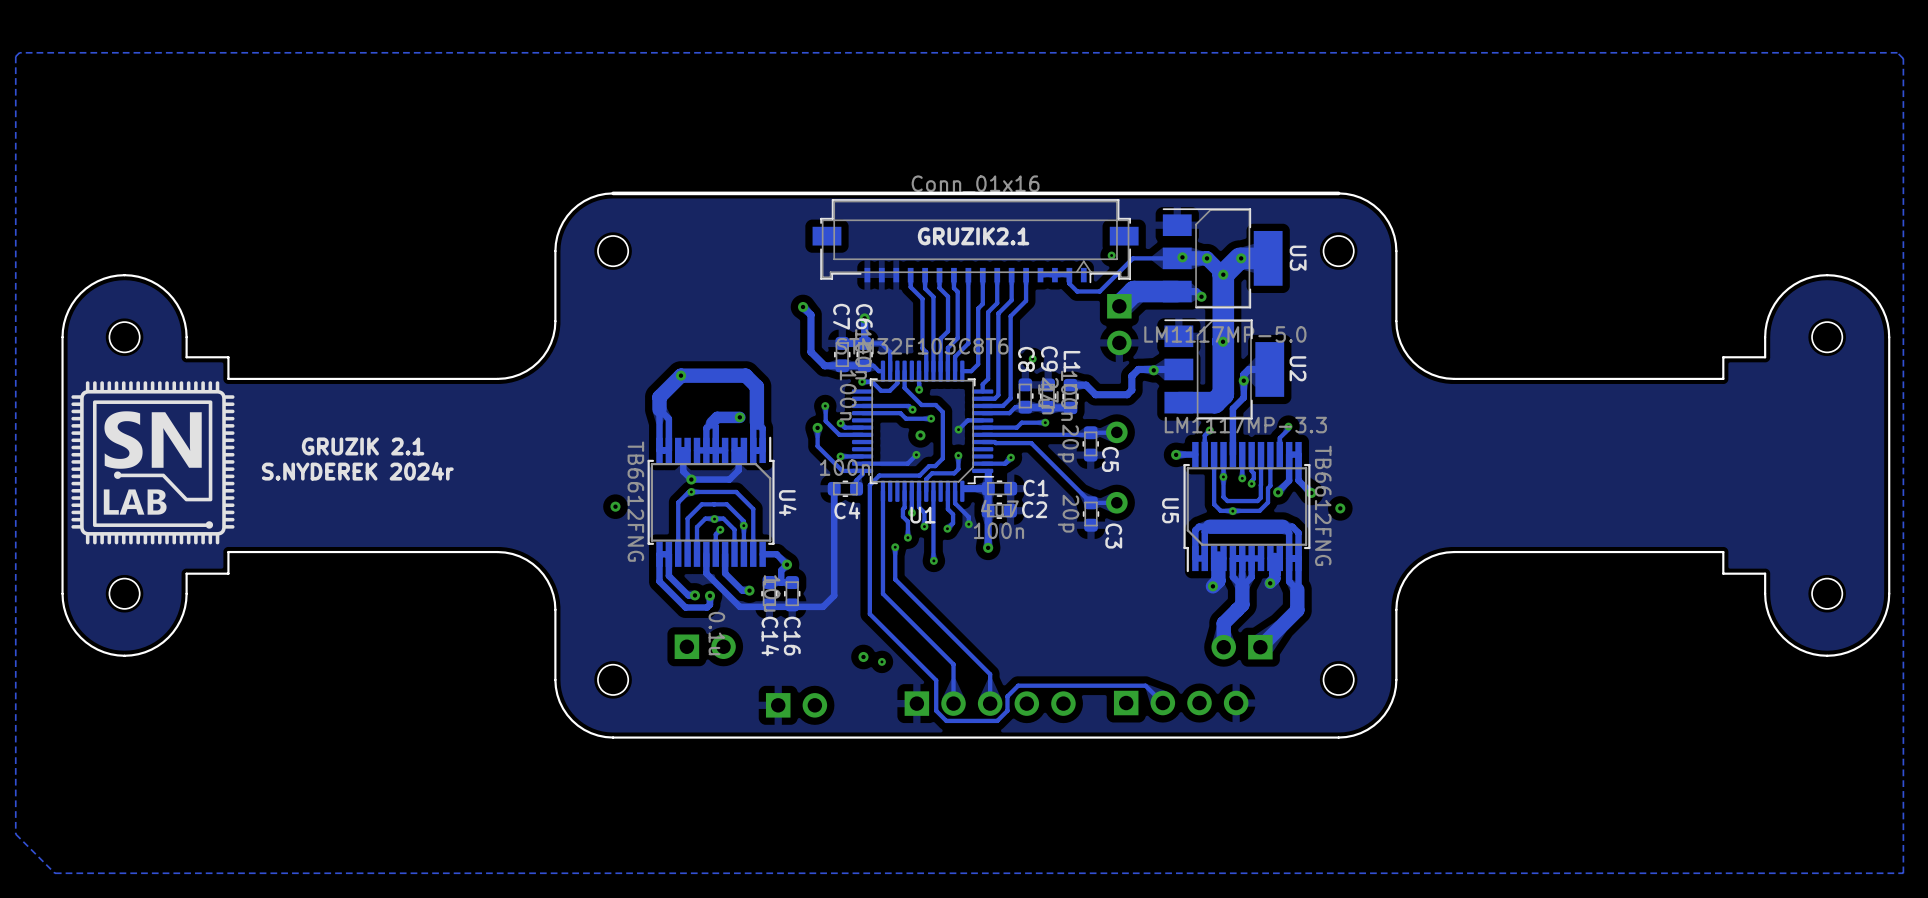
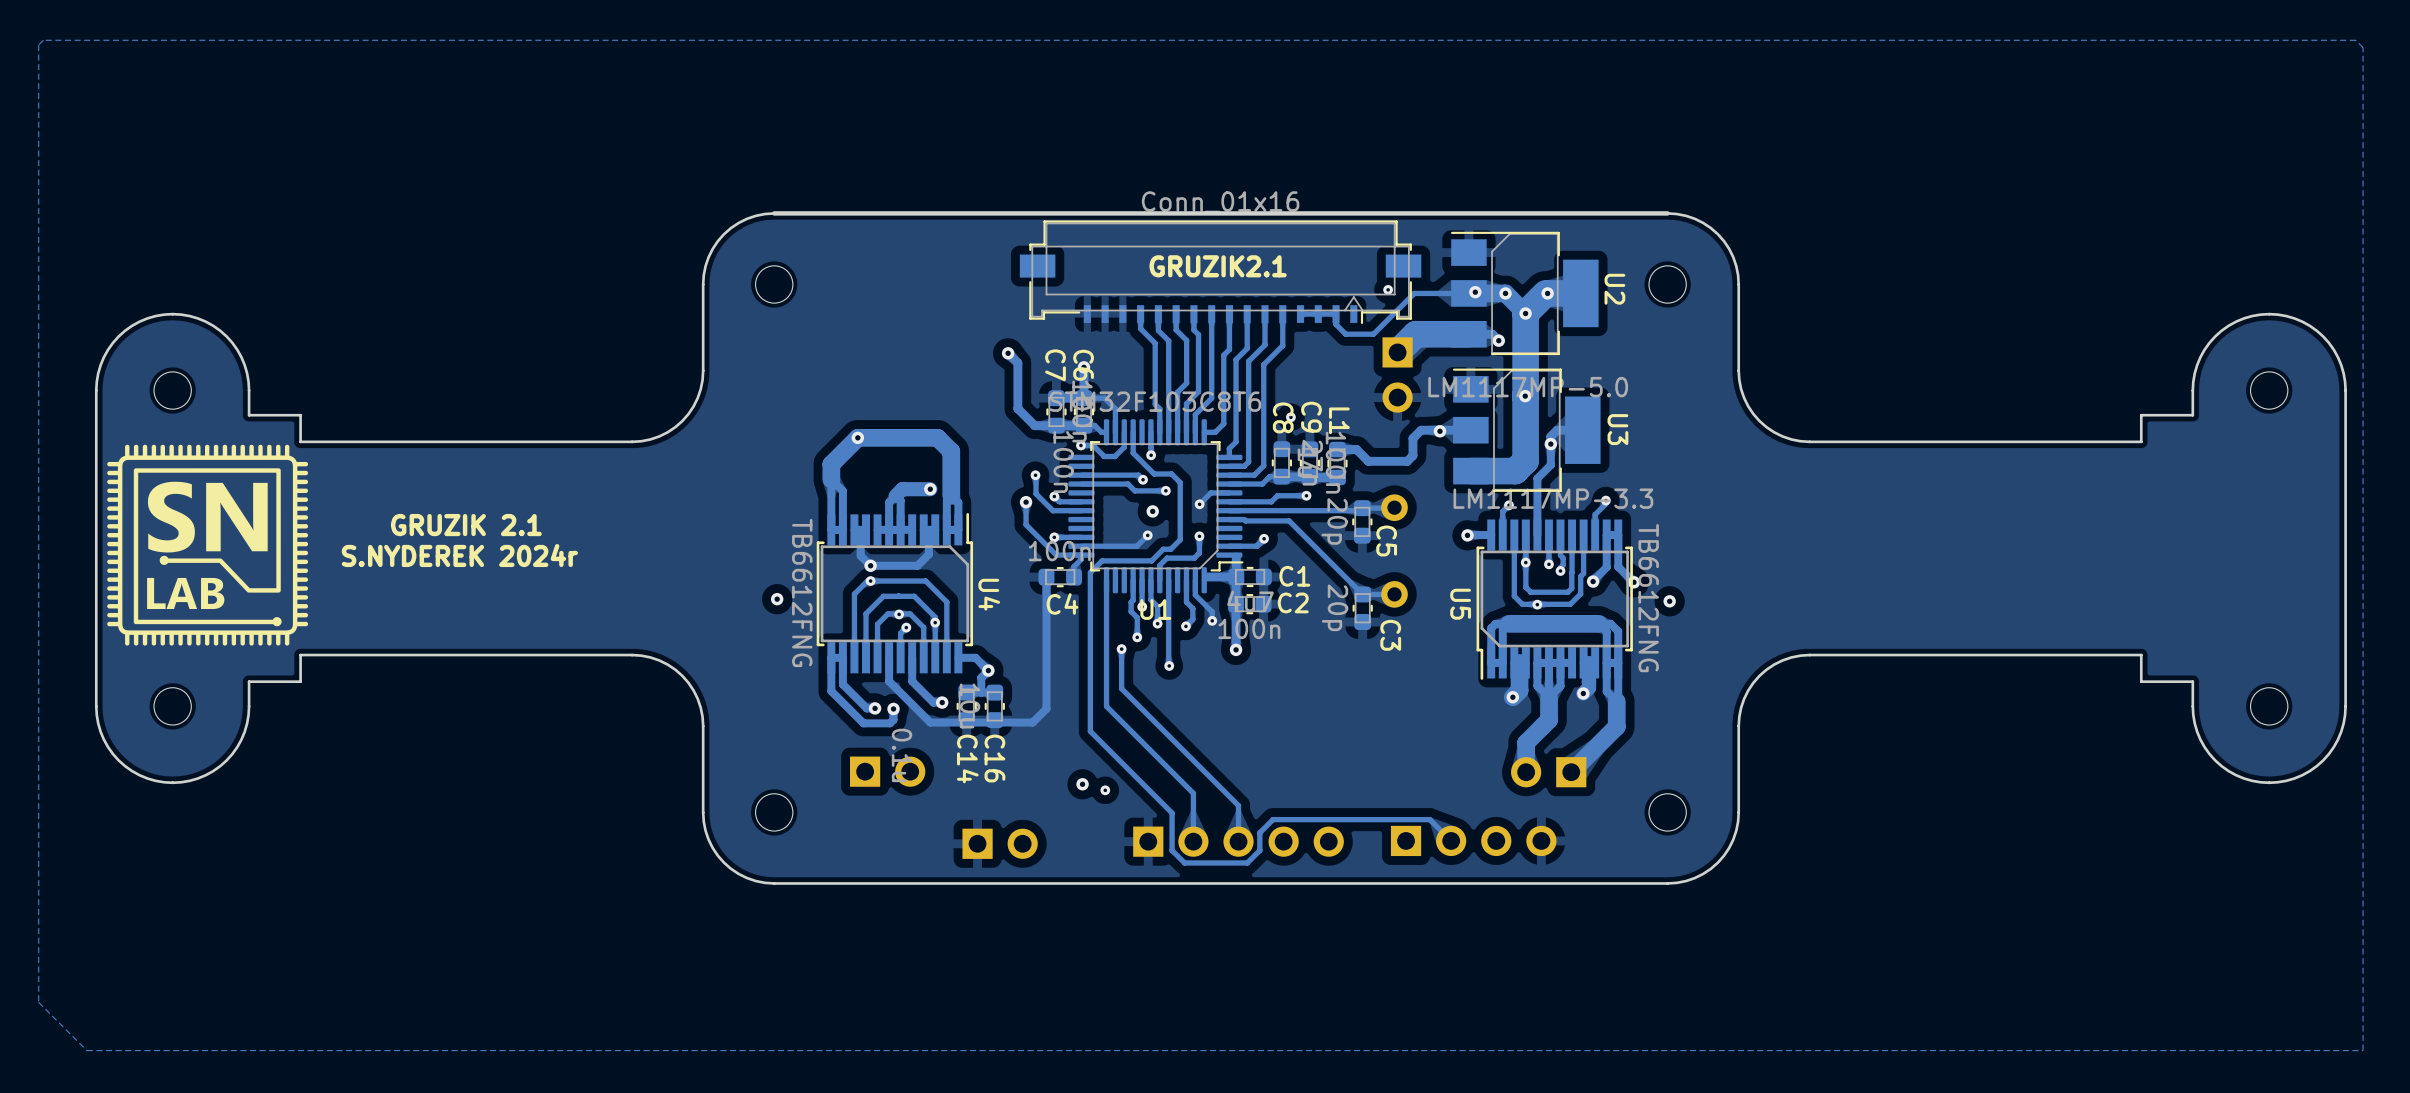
U3 name position: U3 (1298, 258) -> U3 (1617, 429)
U2 name position: U2 (1297, 368) -> U2 (1614, 289)

